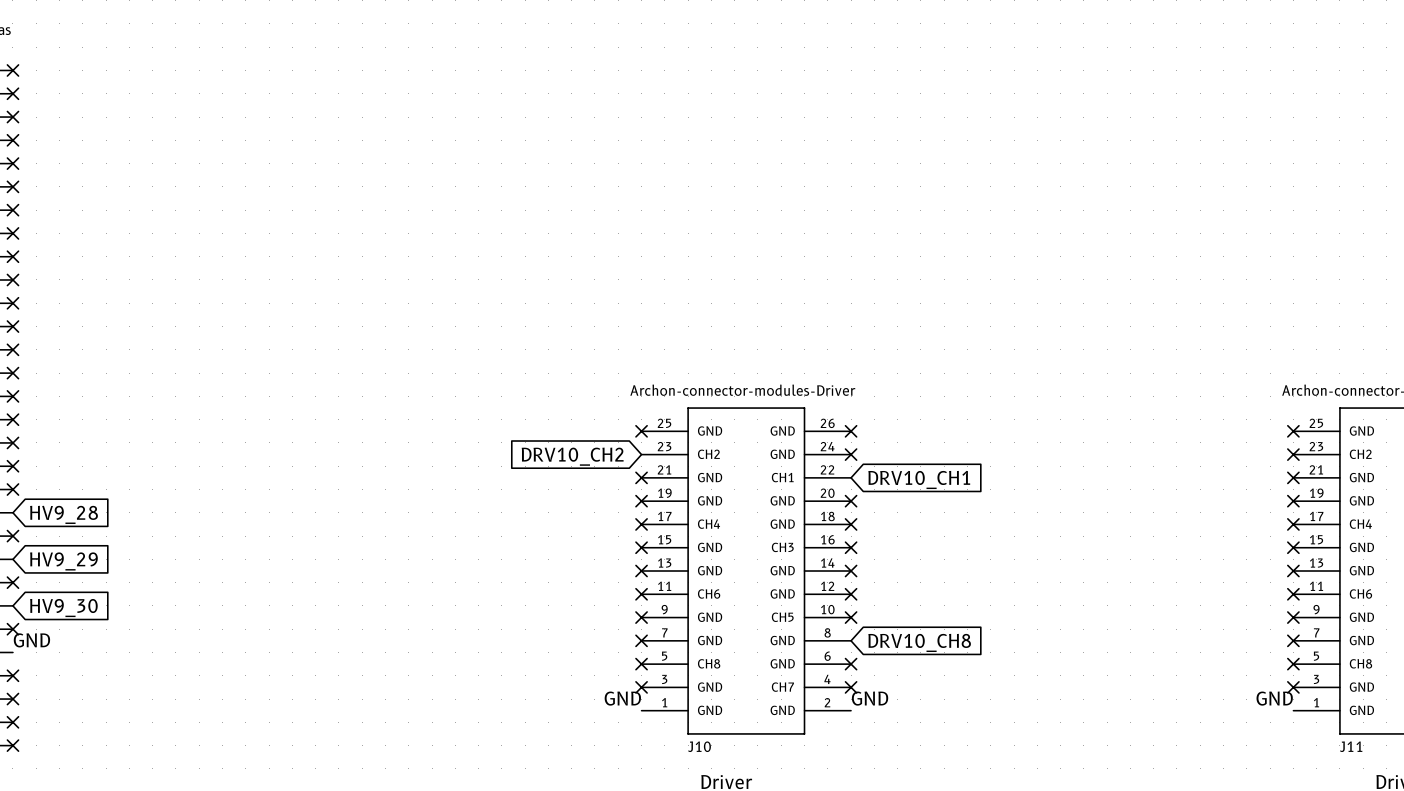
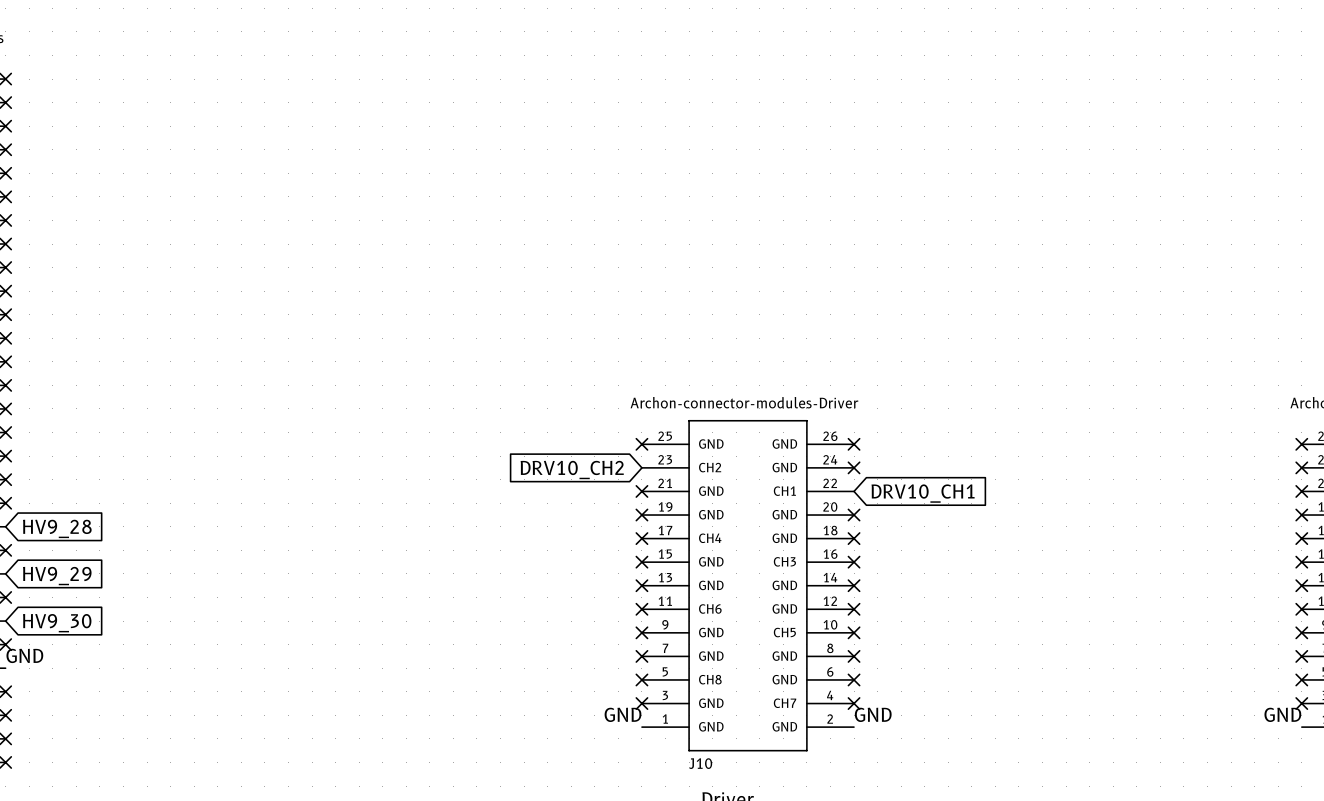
no-connect mark: none -> (854, 656)
global label: DRV10_CH8 (919, 642) -> none

